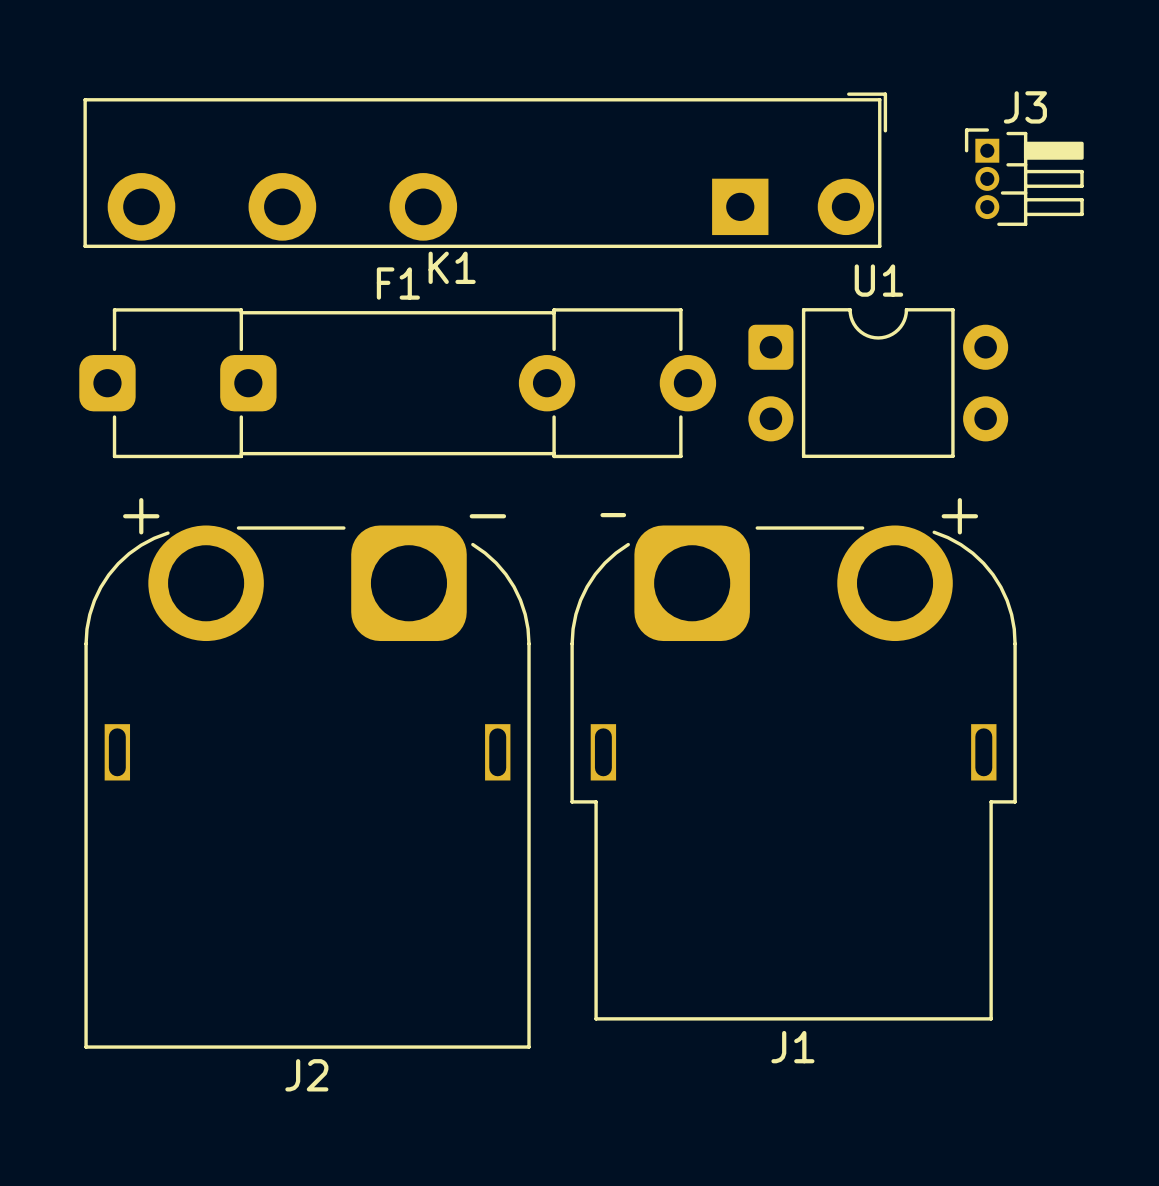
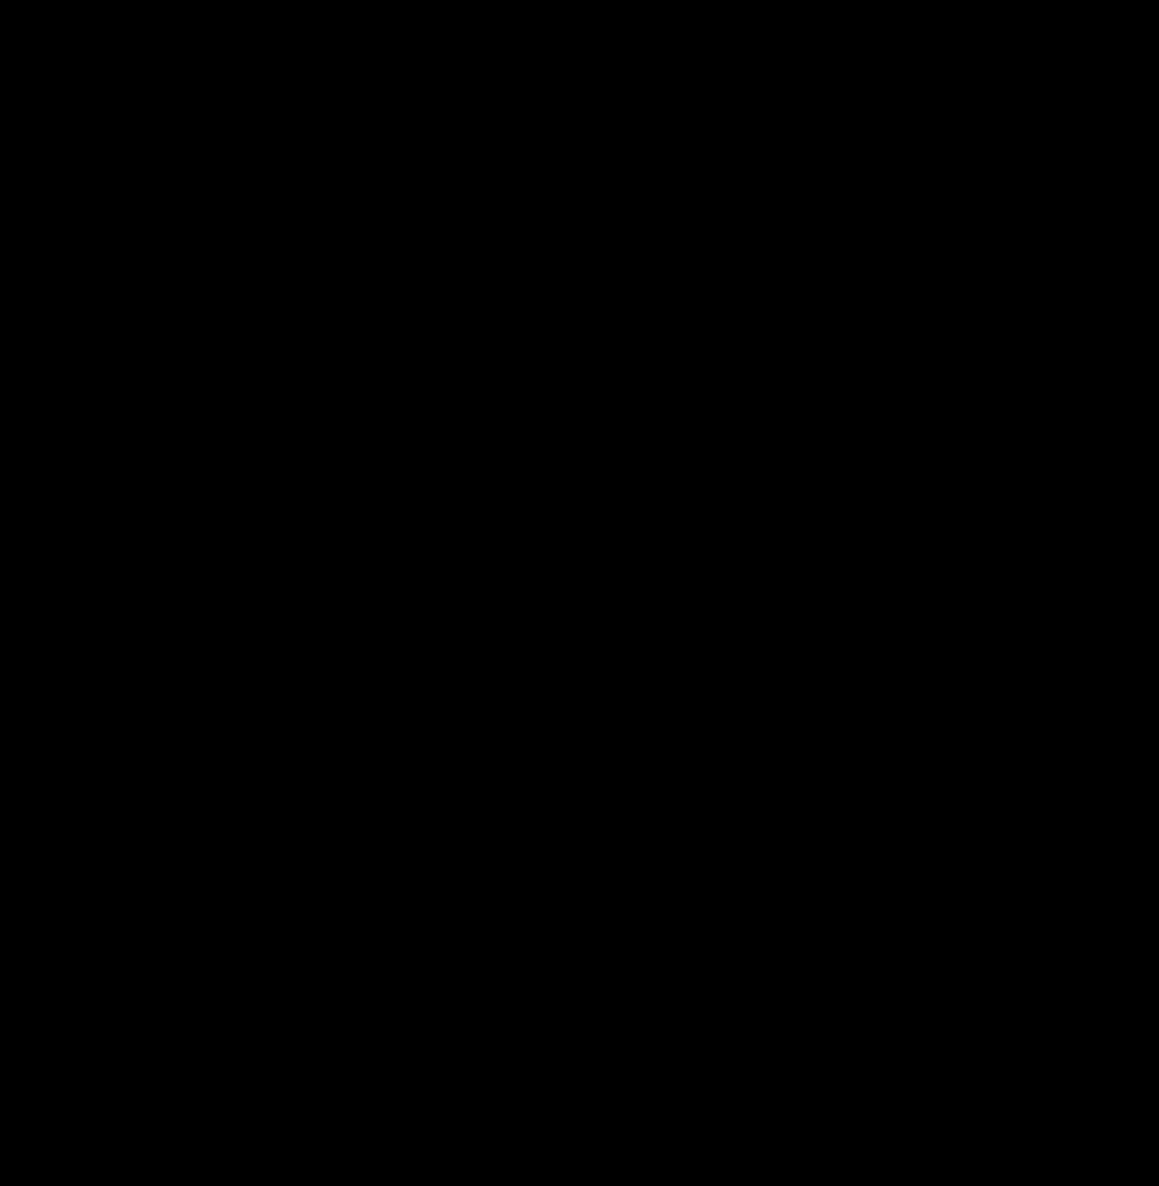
K1: (485, 170) -> none
J3: (1024, 177) -> none
F1: (397, 383) -> none
U1: (878, 383) -> none
J1: (793, 773) -> none
J2: (307, 787) -> none

